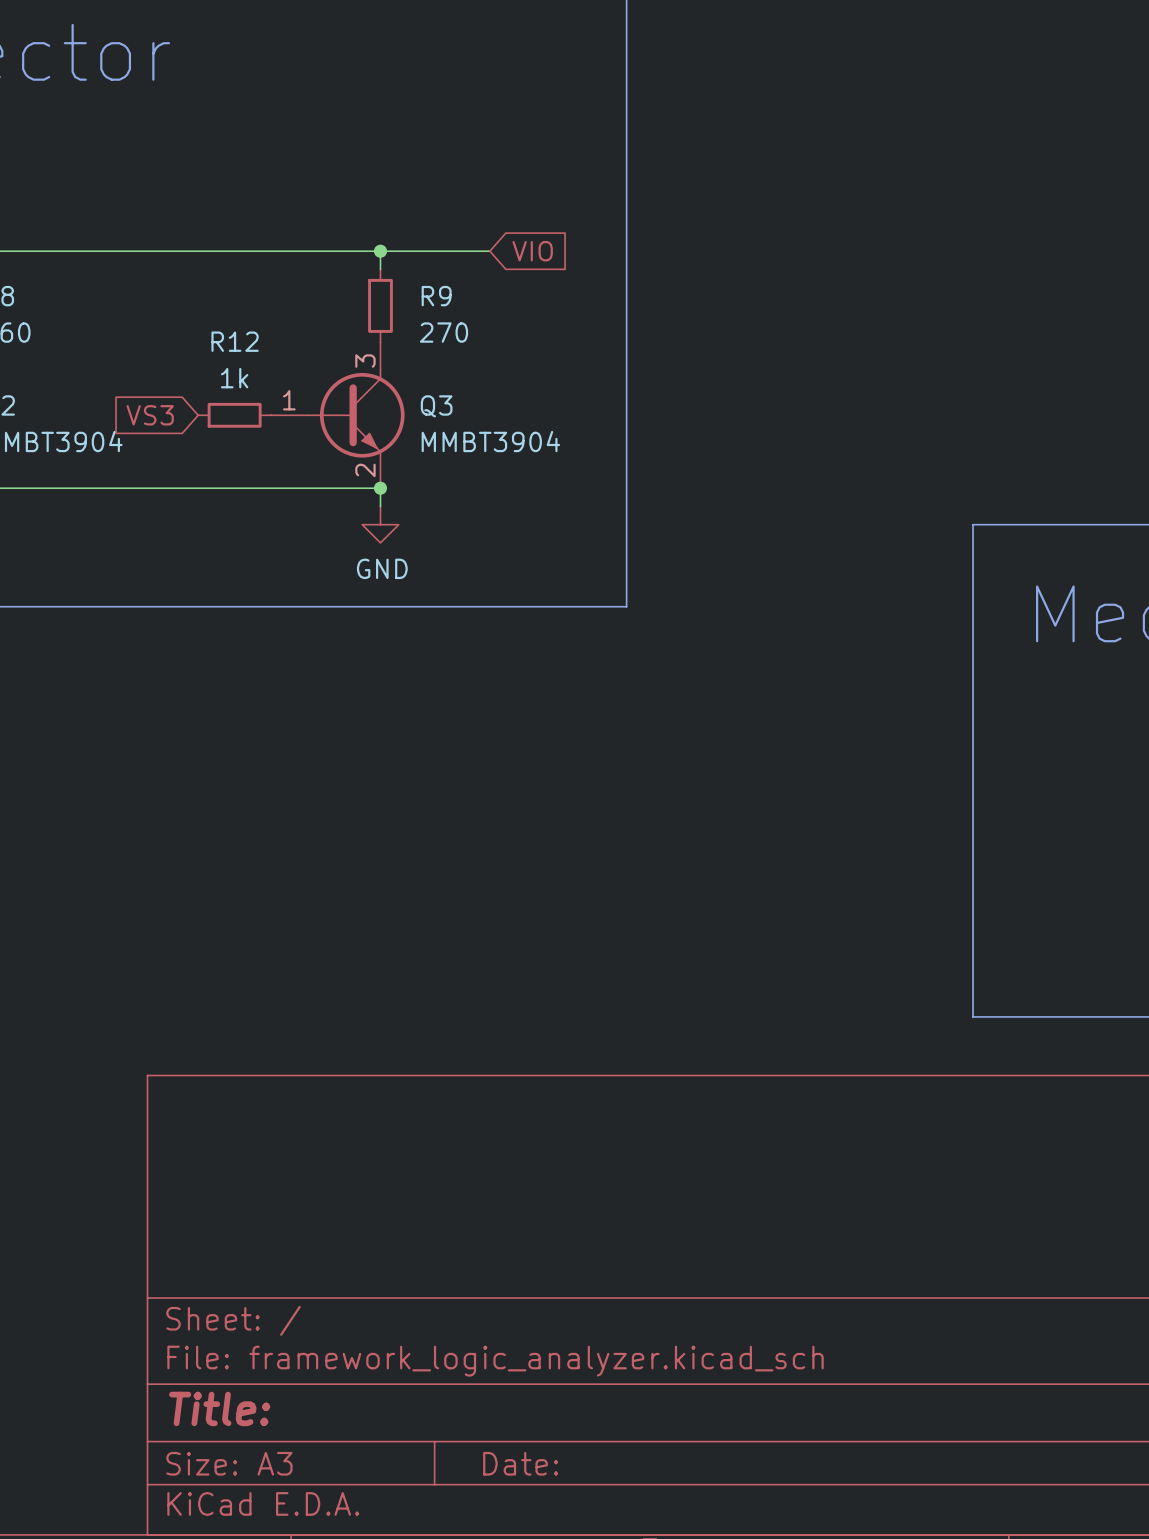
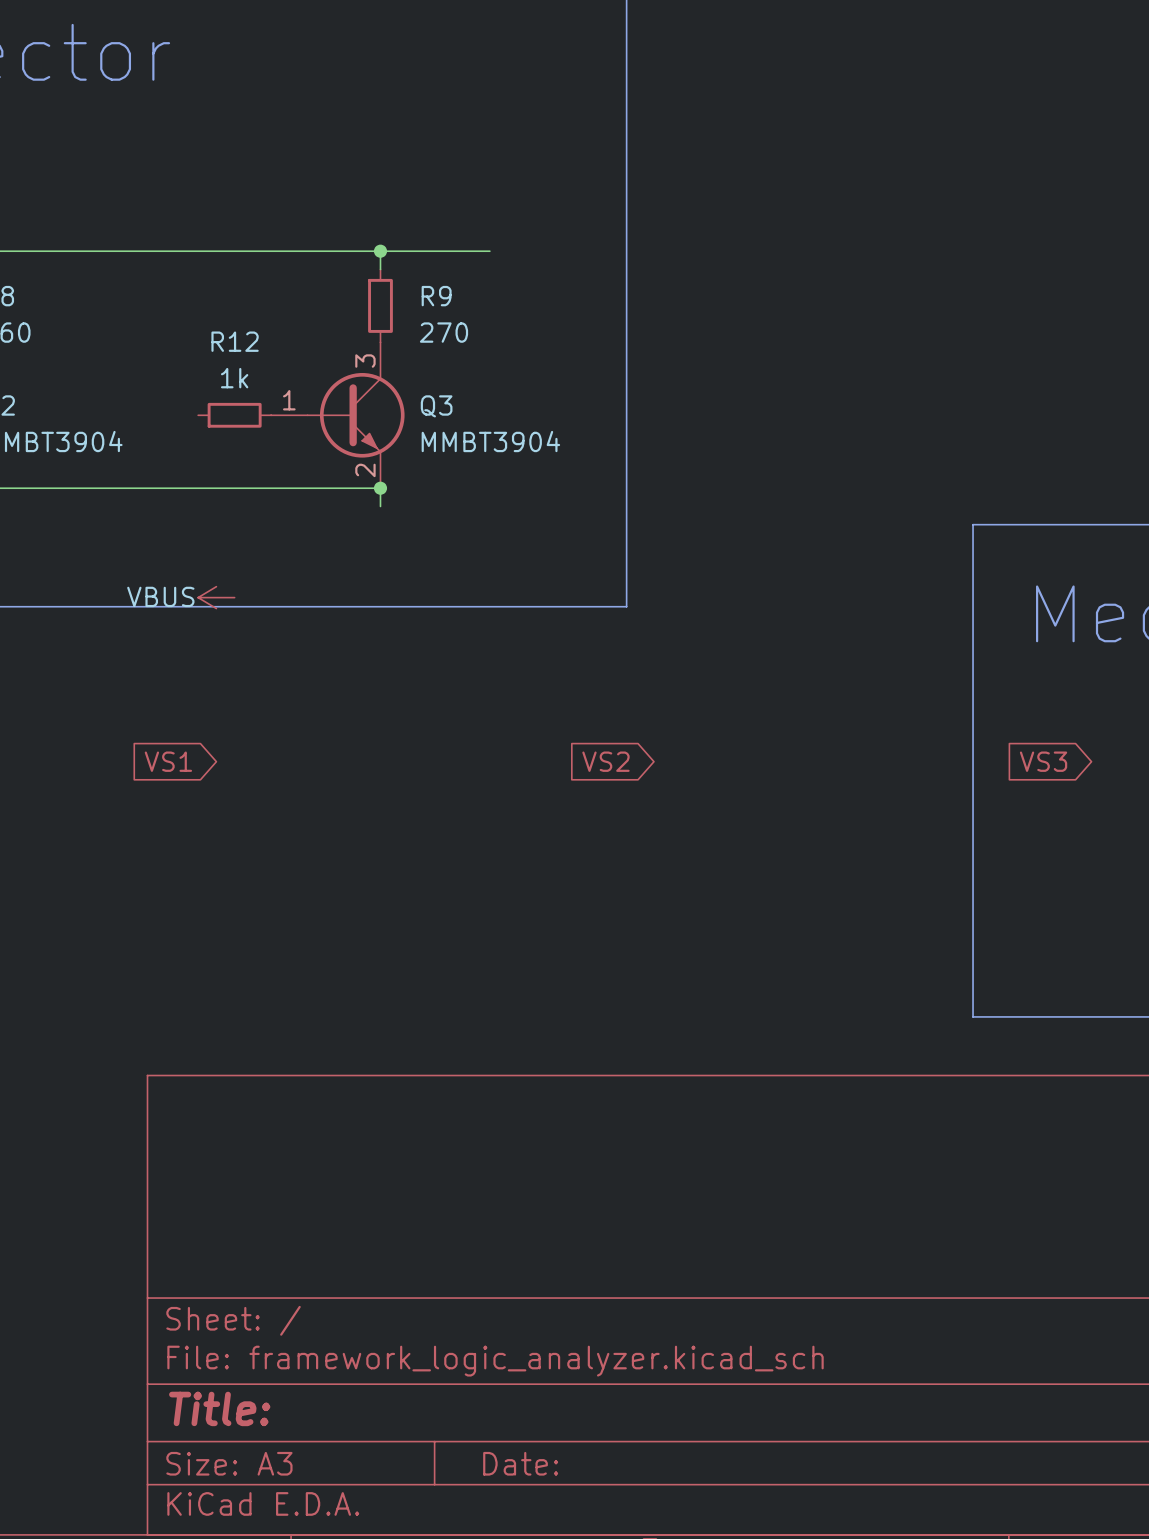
global label: VIO (532, 251) -> none
global label: VS3 (150, 415) -> none
power symbol: GND (380, 524) -> none
power symbol: none -> VBUS (216, 597)
global label: none -> VS1 (168, 761)
global label: none -> VS2 (605, 761)
global label: none -> VS3 (1043, 761)

